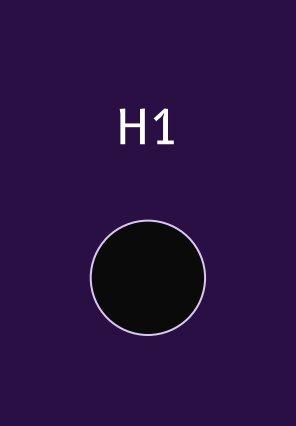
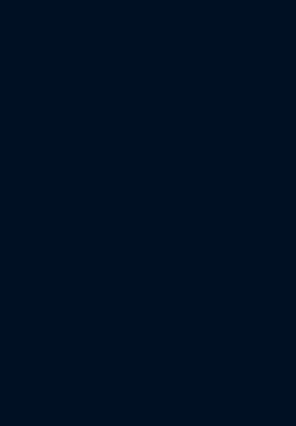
H1: (147, 277) -> none

